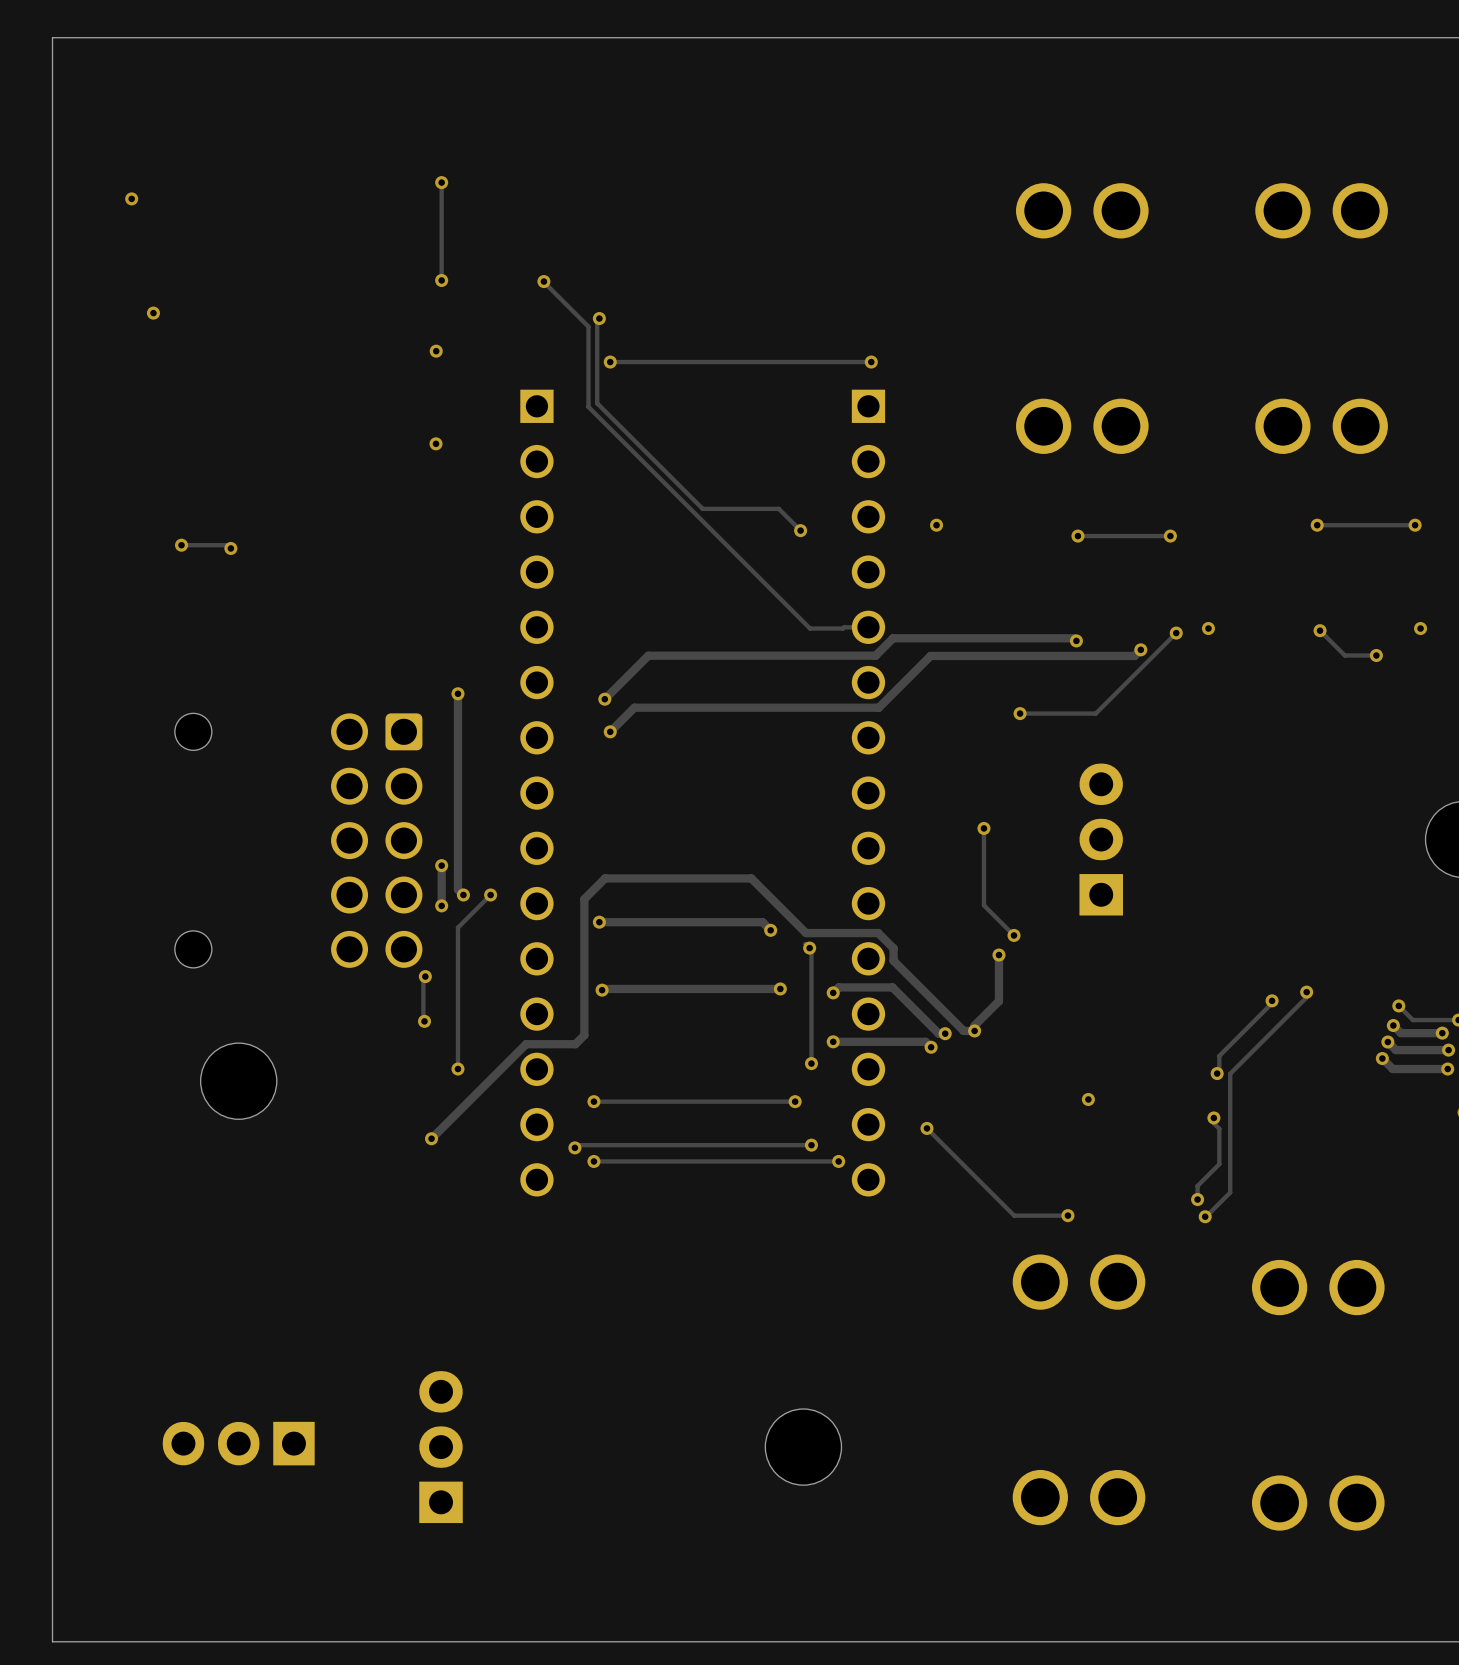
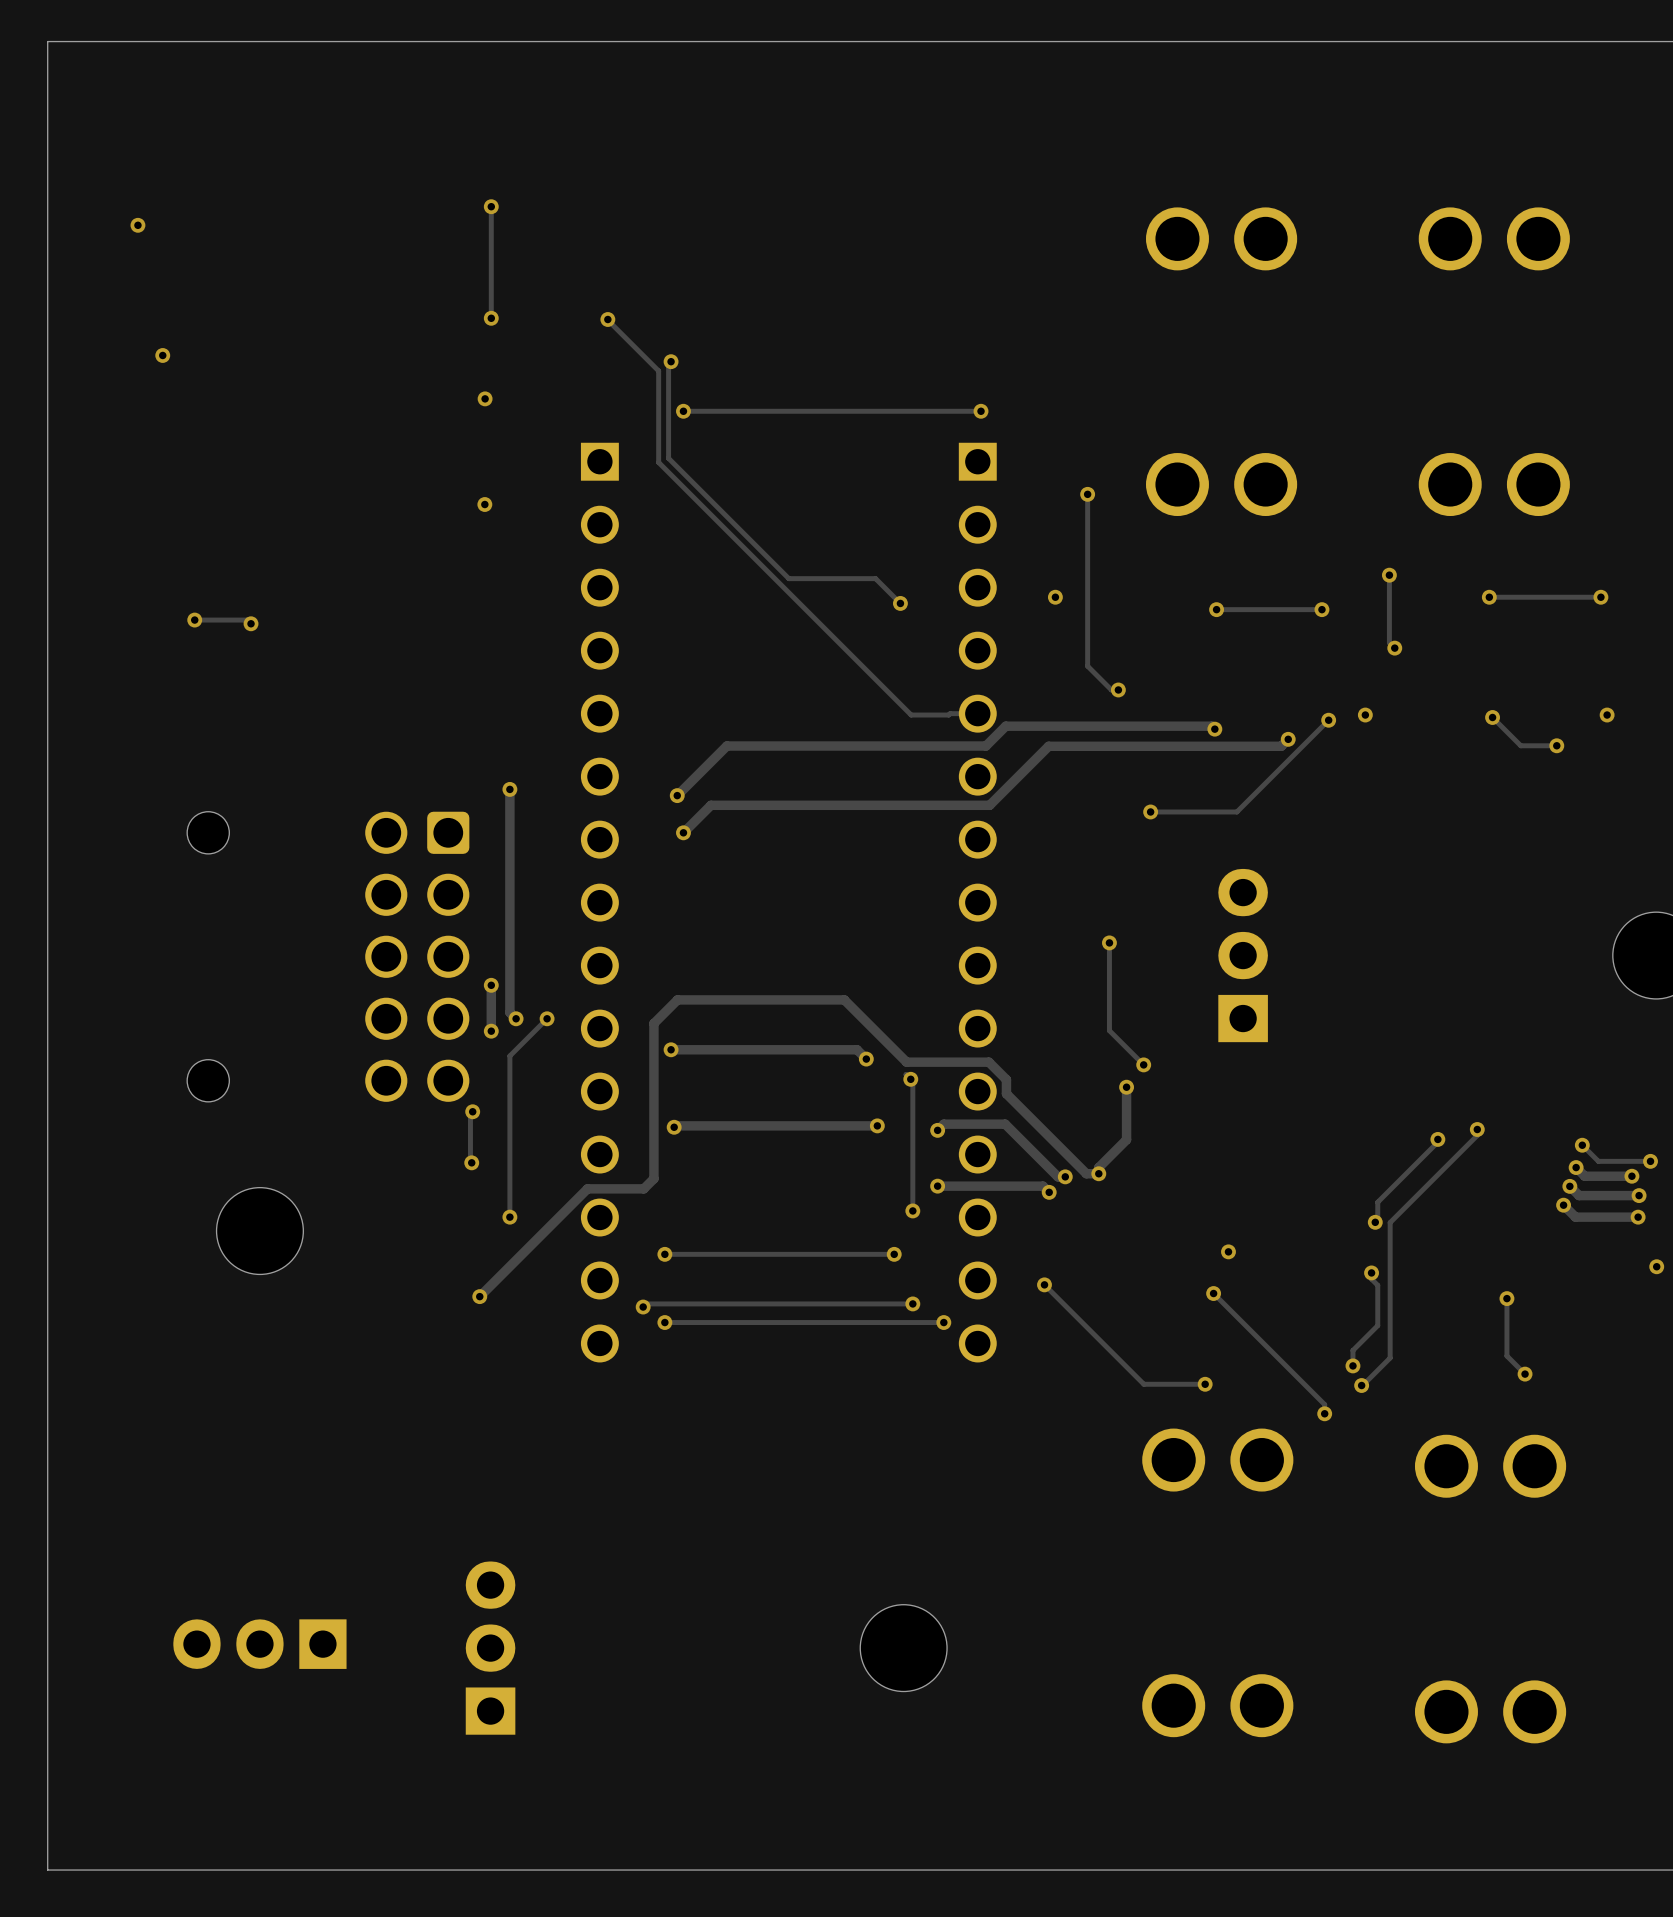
track: none -> (1087, 494) (1087, 666) (1111, 689) (1118, 689)
via: none -> (1087, 494)
track: none -> (1389, 575) (1389, 642) (1394, 648)
via: none -> (1389, 575)
via: none -> (1394, 648)
via: none -> (1118, 689)
track: none -> (1213, 1293) (1324, 1404) (1324, 1413)
via: none -> (1213, 1293)
track: none -> (1506, 1298) (1506, 1356) (1525, 1374)
via: none -> (1506, 1298)
via: none -> (1525, 1374)
via: none -> (1324, 1413)

